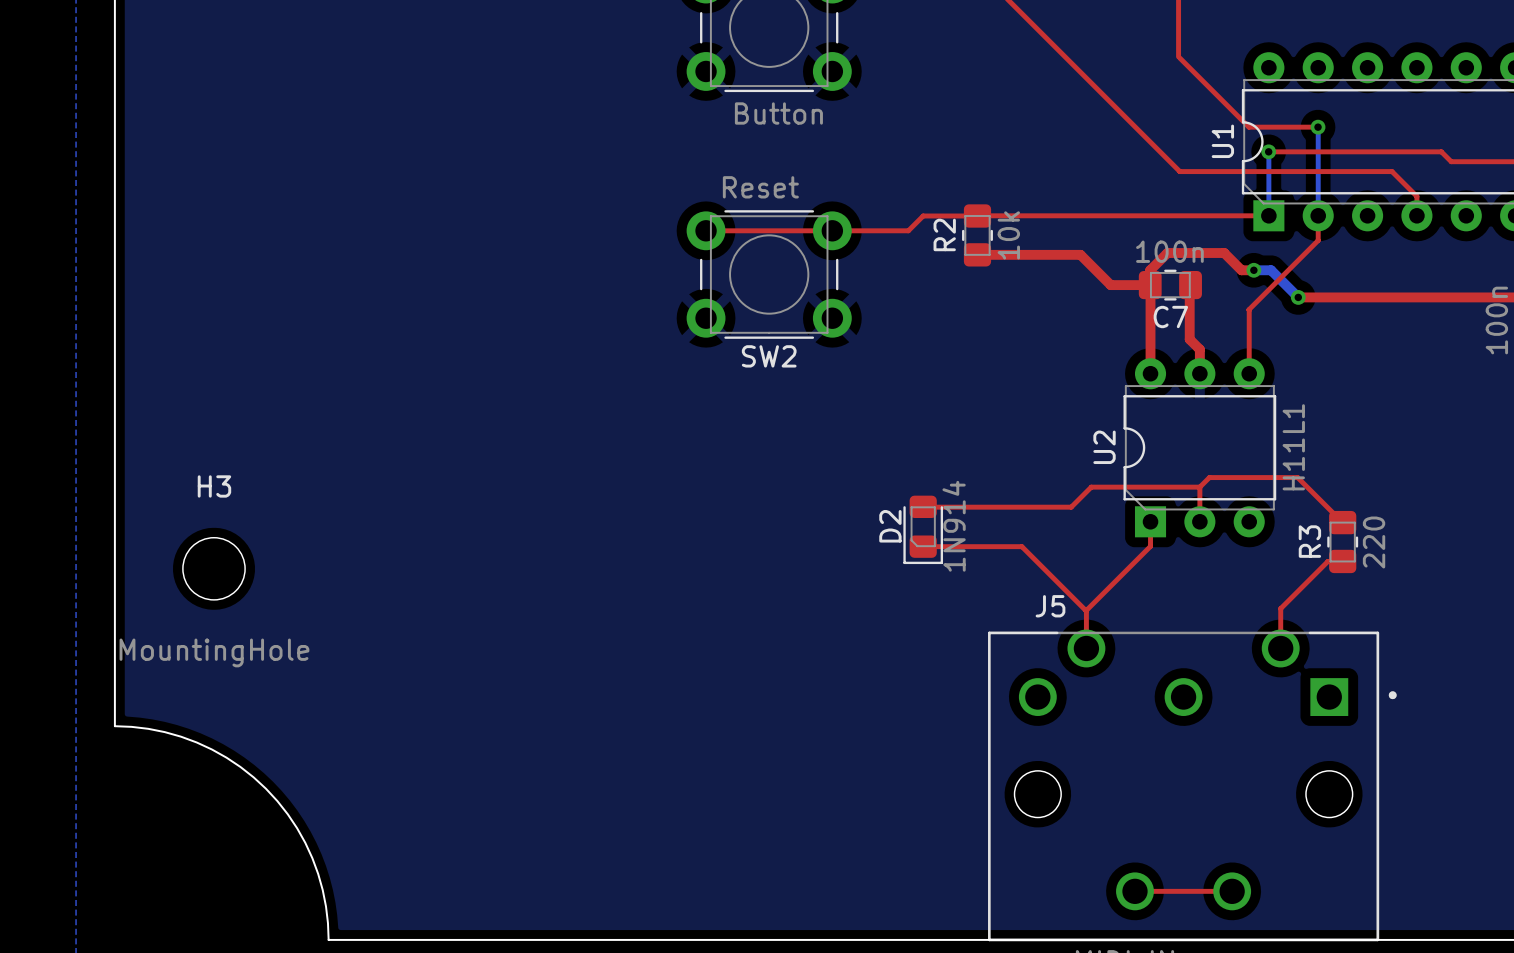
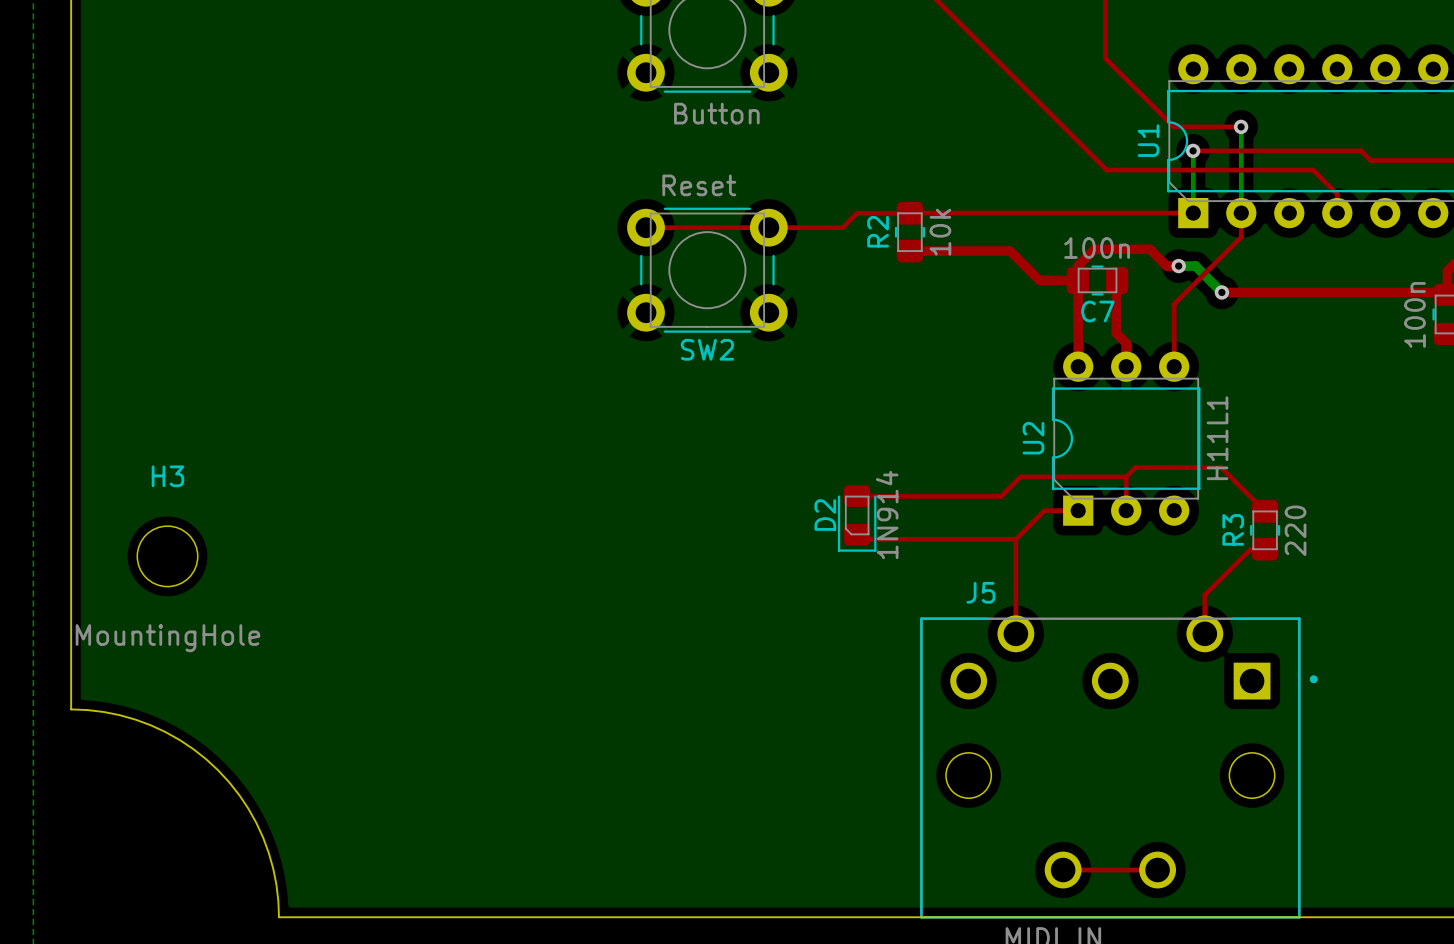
top track: (1150, 521) (1150, 546) (1086, 610) -> (1078, 510) (1044, 510) (1015, 539)
top track: (923, 546) (1021, 546) (1086, 611) -> (857, 534) (861, 539) (1015, 539)
top track: none -> (1015, 539) (1015, 597)

